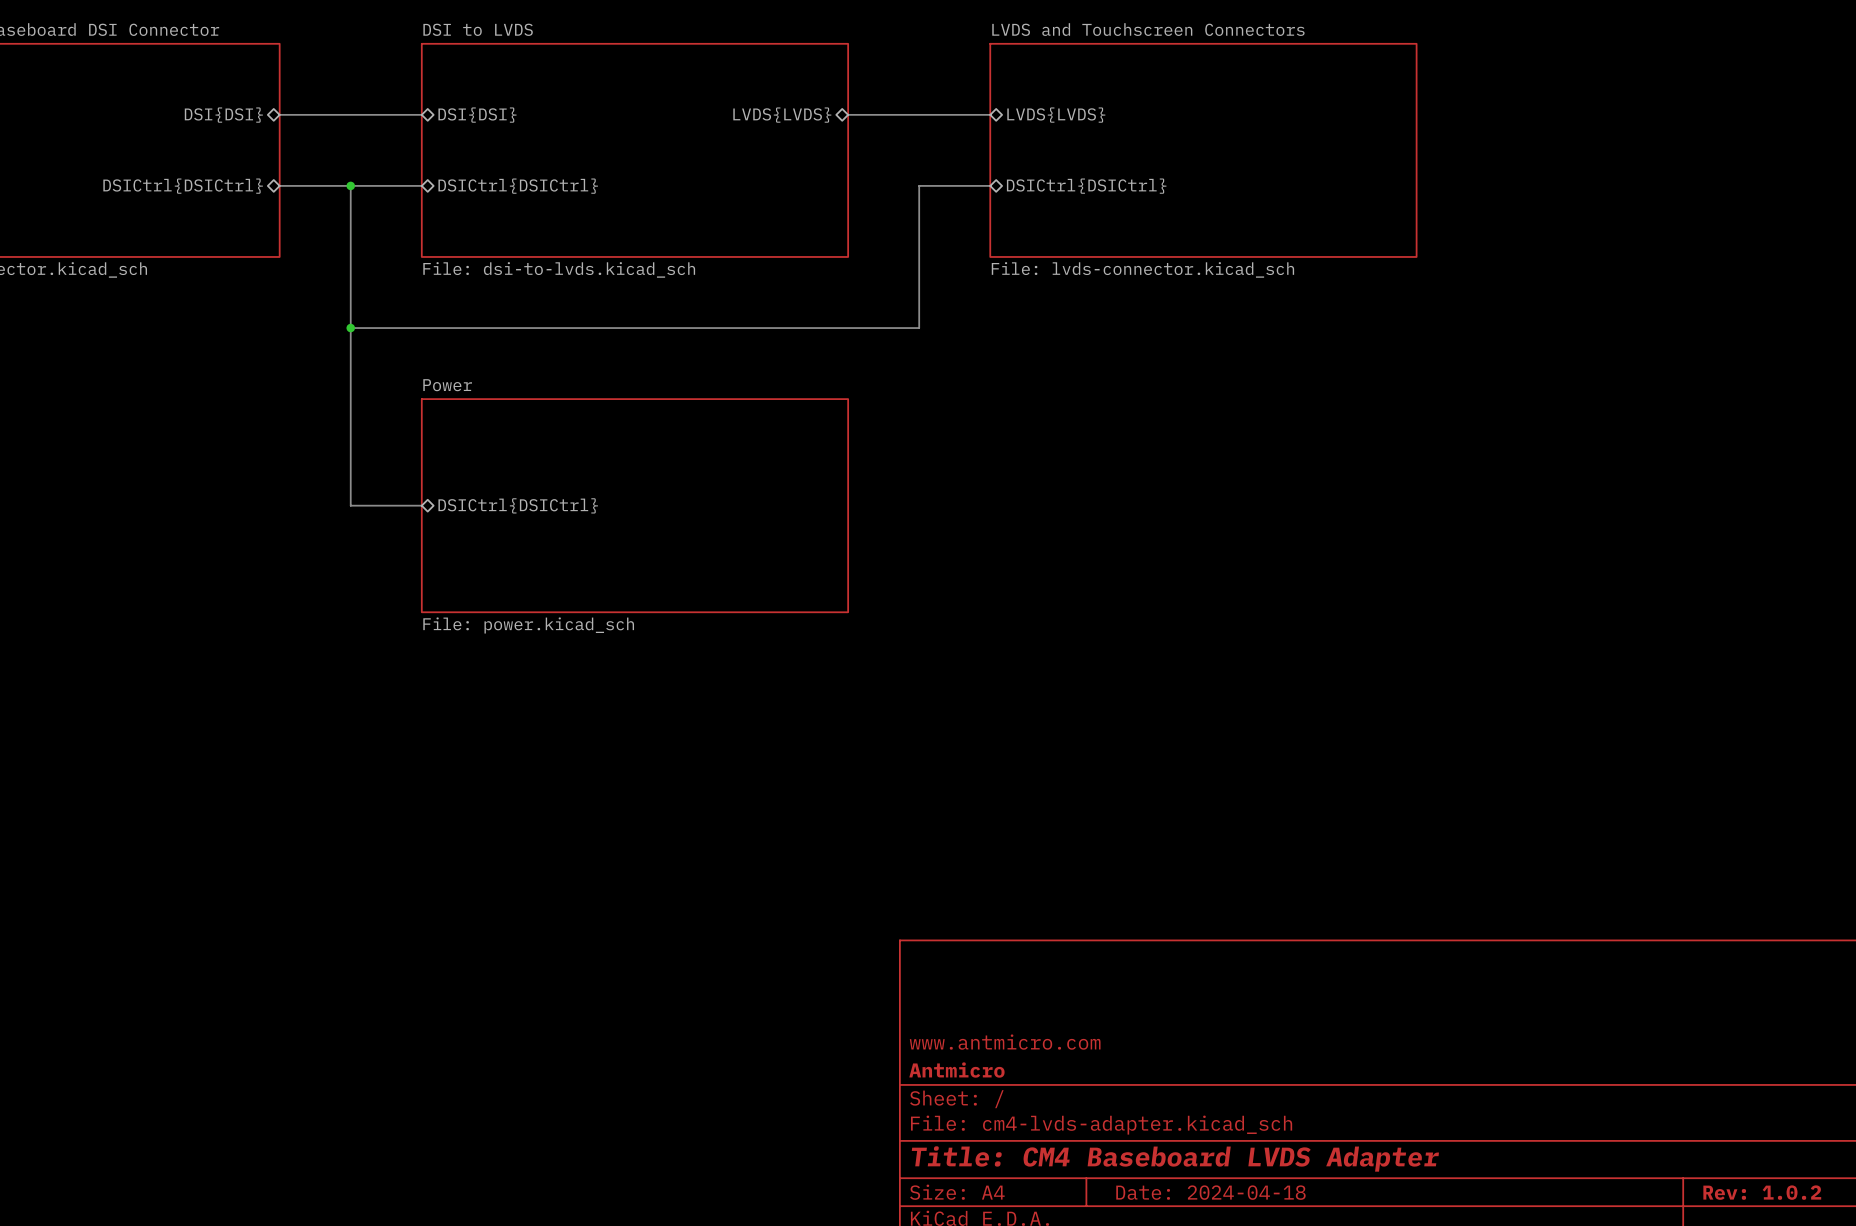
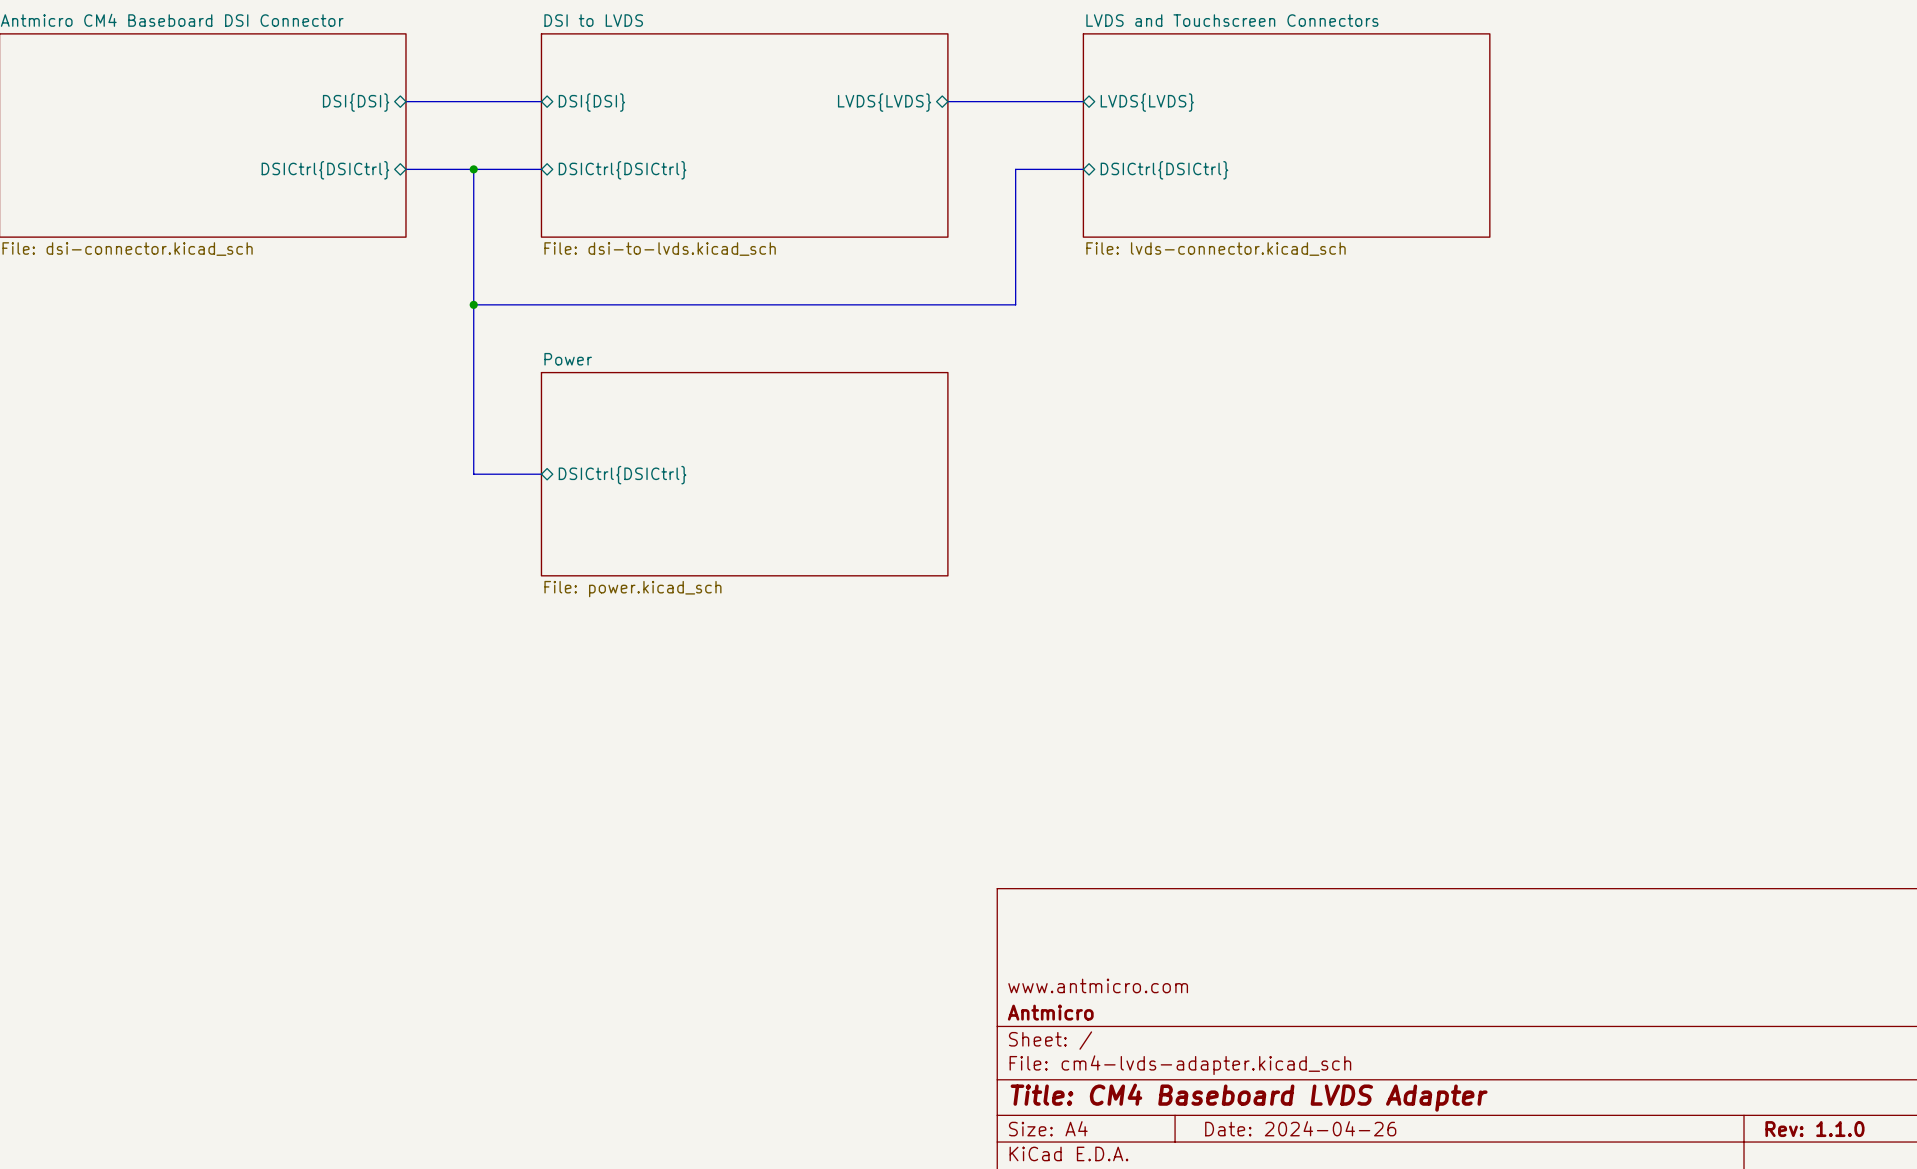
title block: Date: 2024-04-18 (1210, 1192) -> Date: 2024-04-26 (1300, 1128)
title block: Rev: 1.0.2 (1762, 1192) -> Rev: 1.1.0 (1814, 1129)

